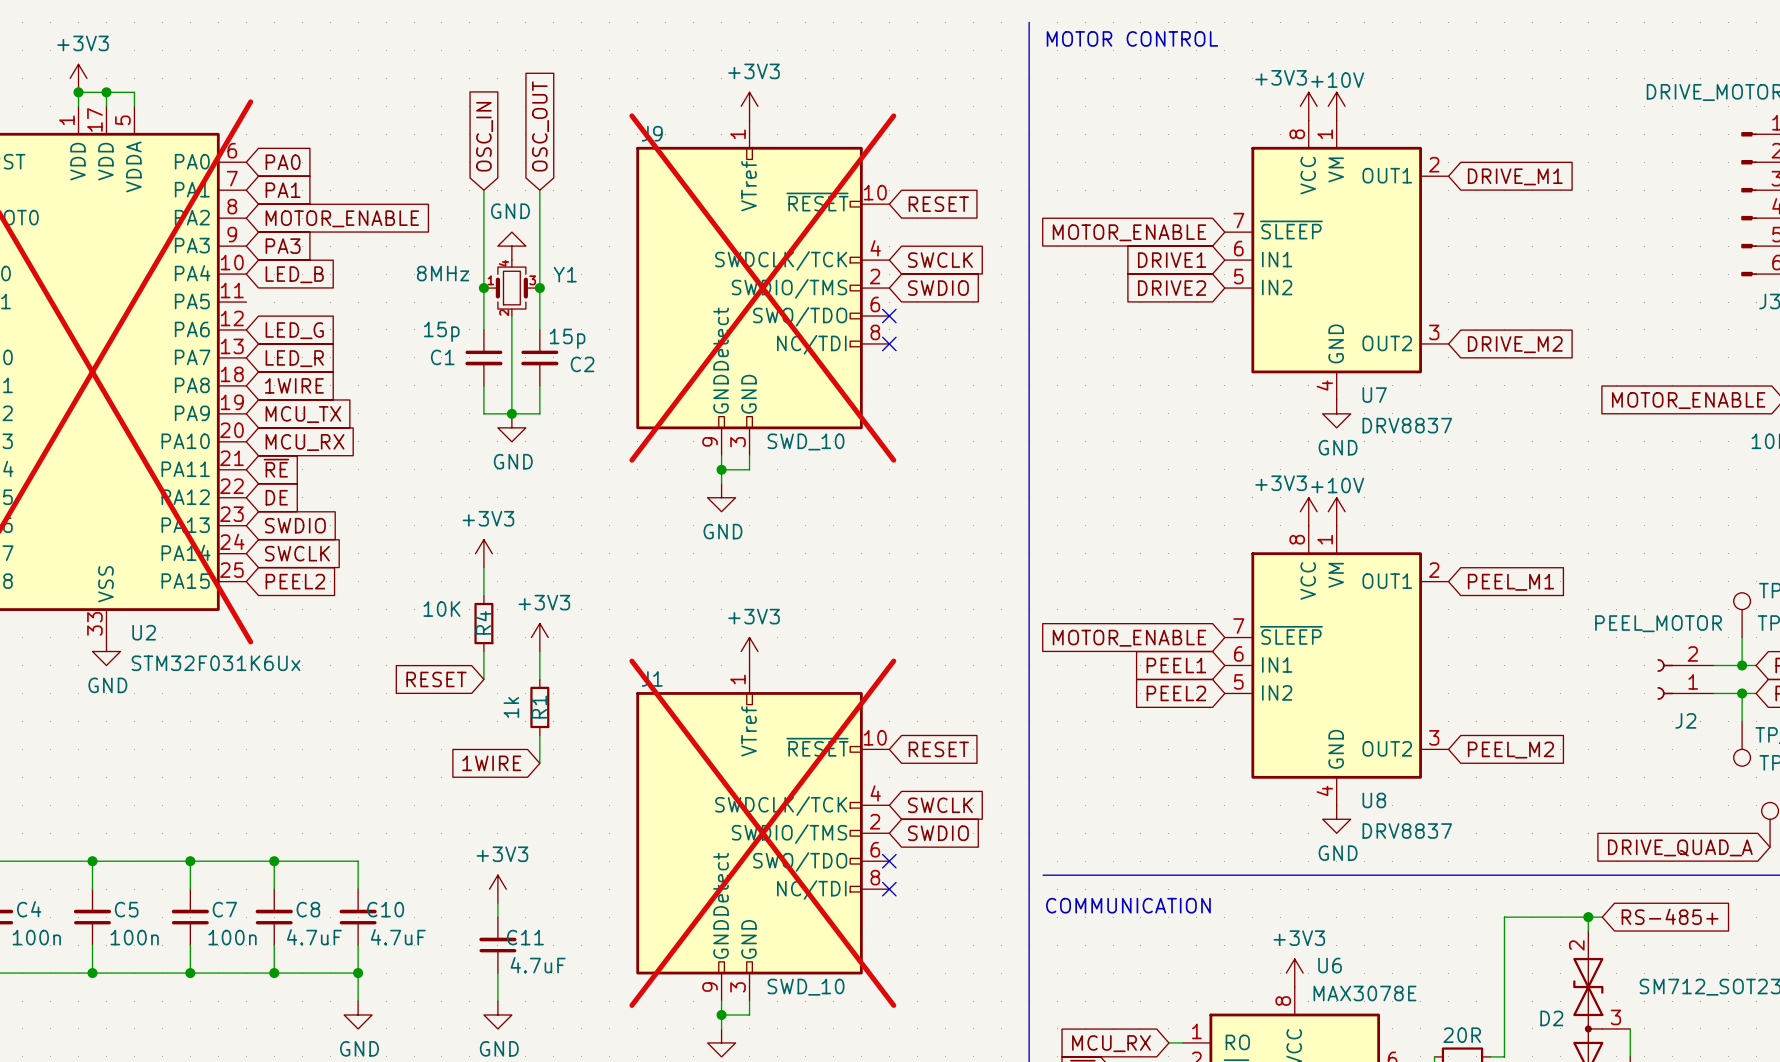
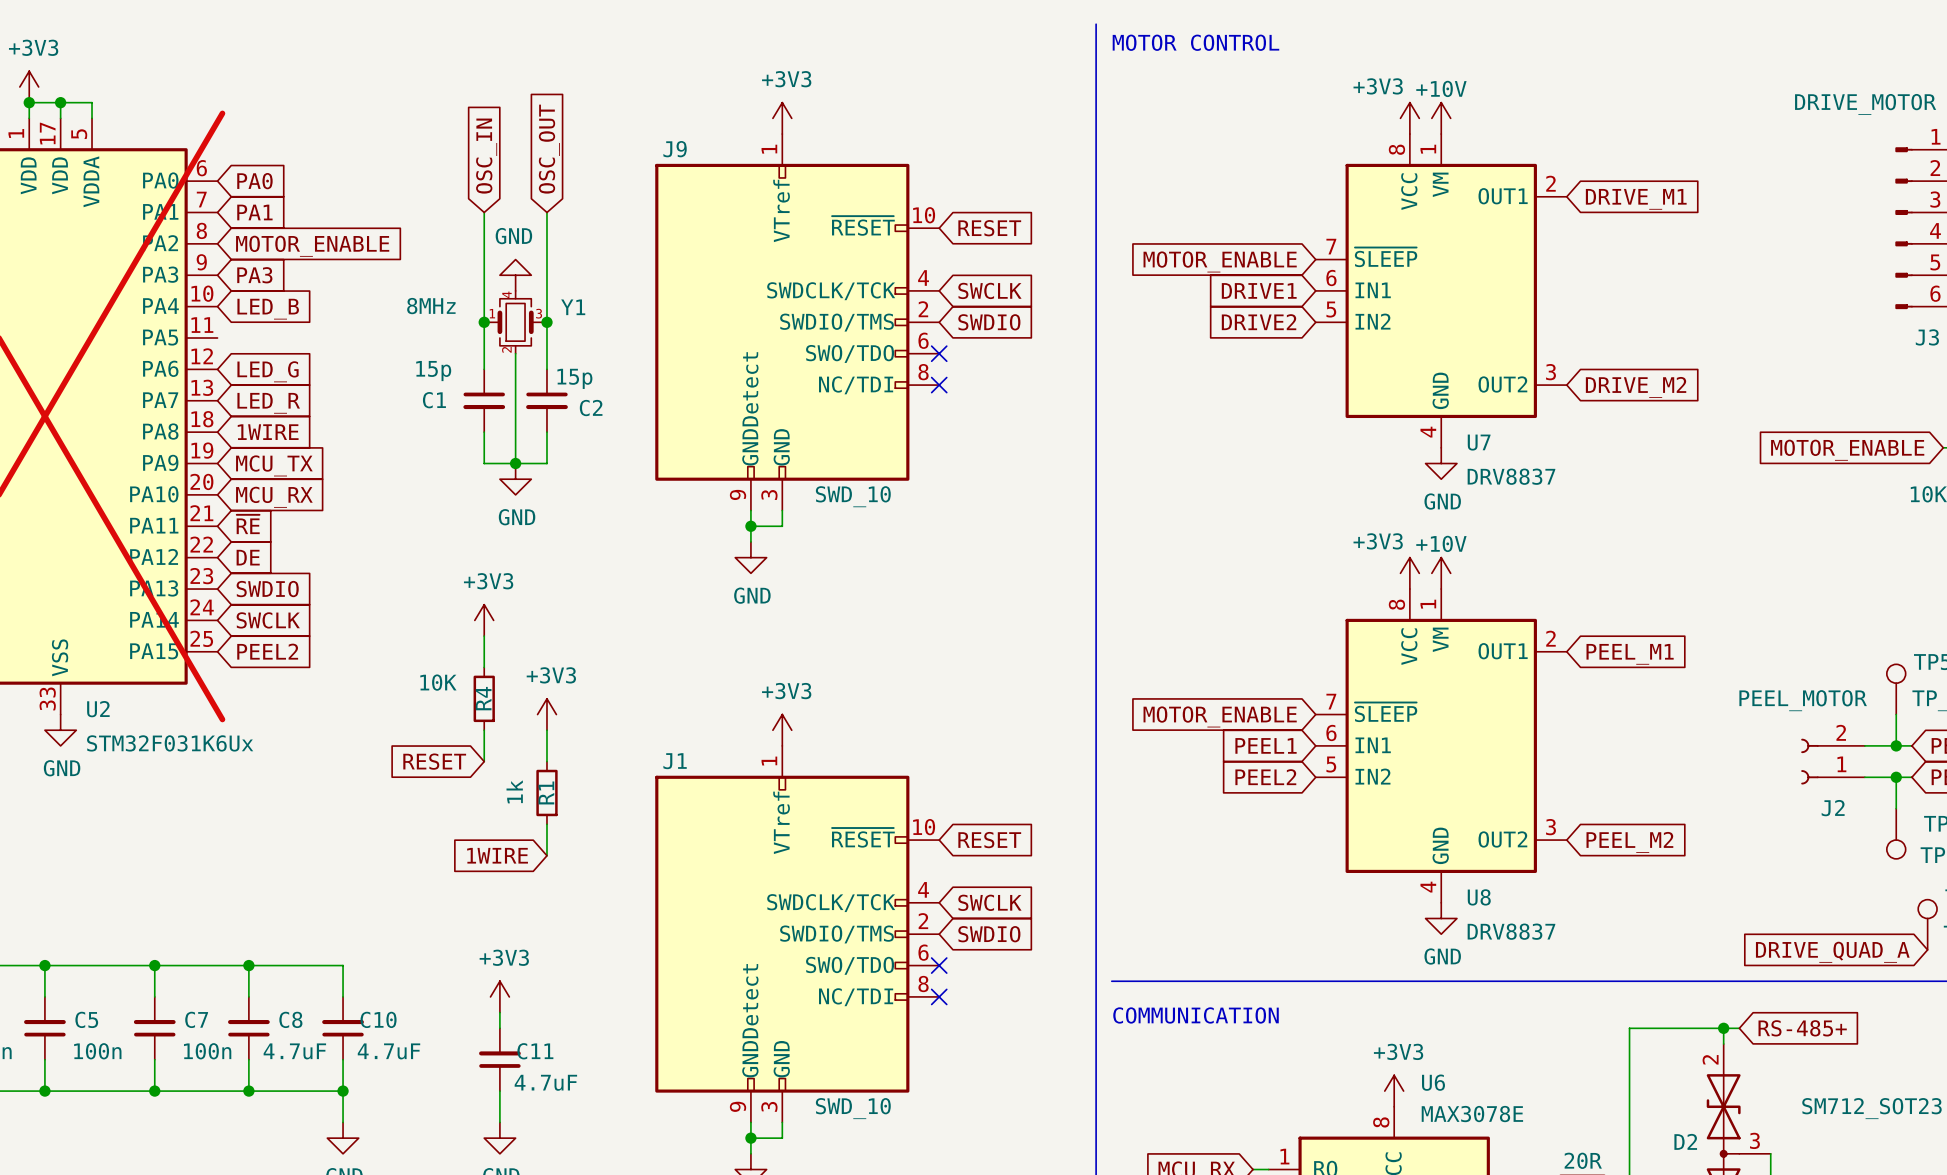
J9 do-not-place cross: (762, 288) -> none
J1 do-not-place cross: (762, 833) -> none

